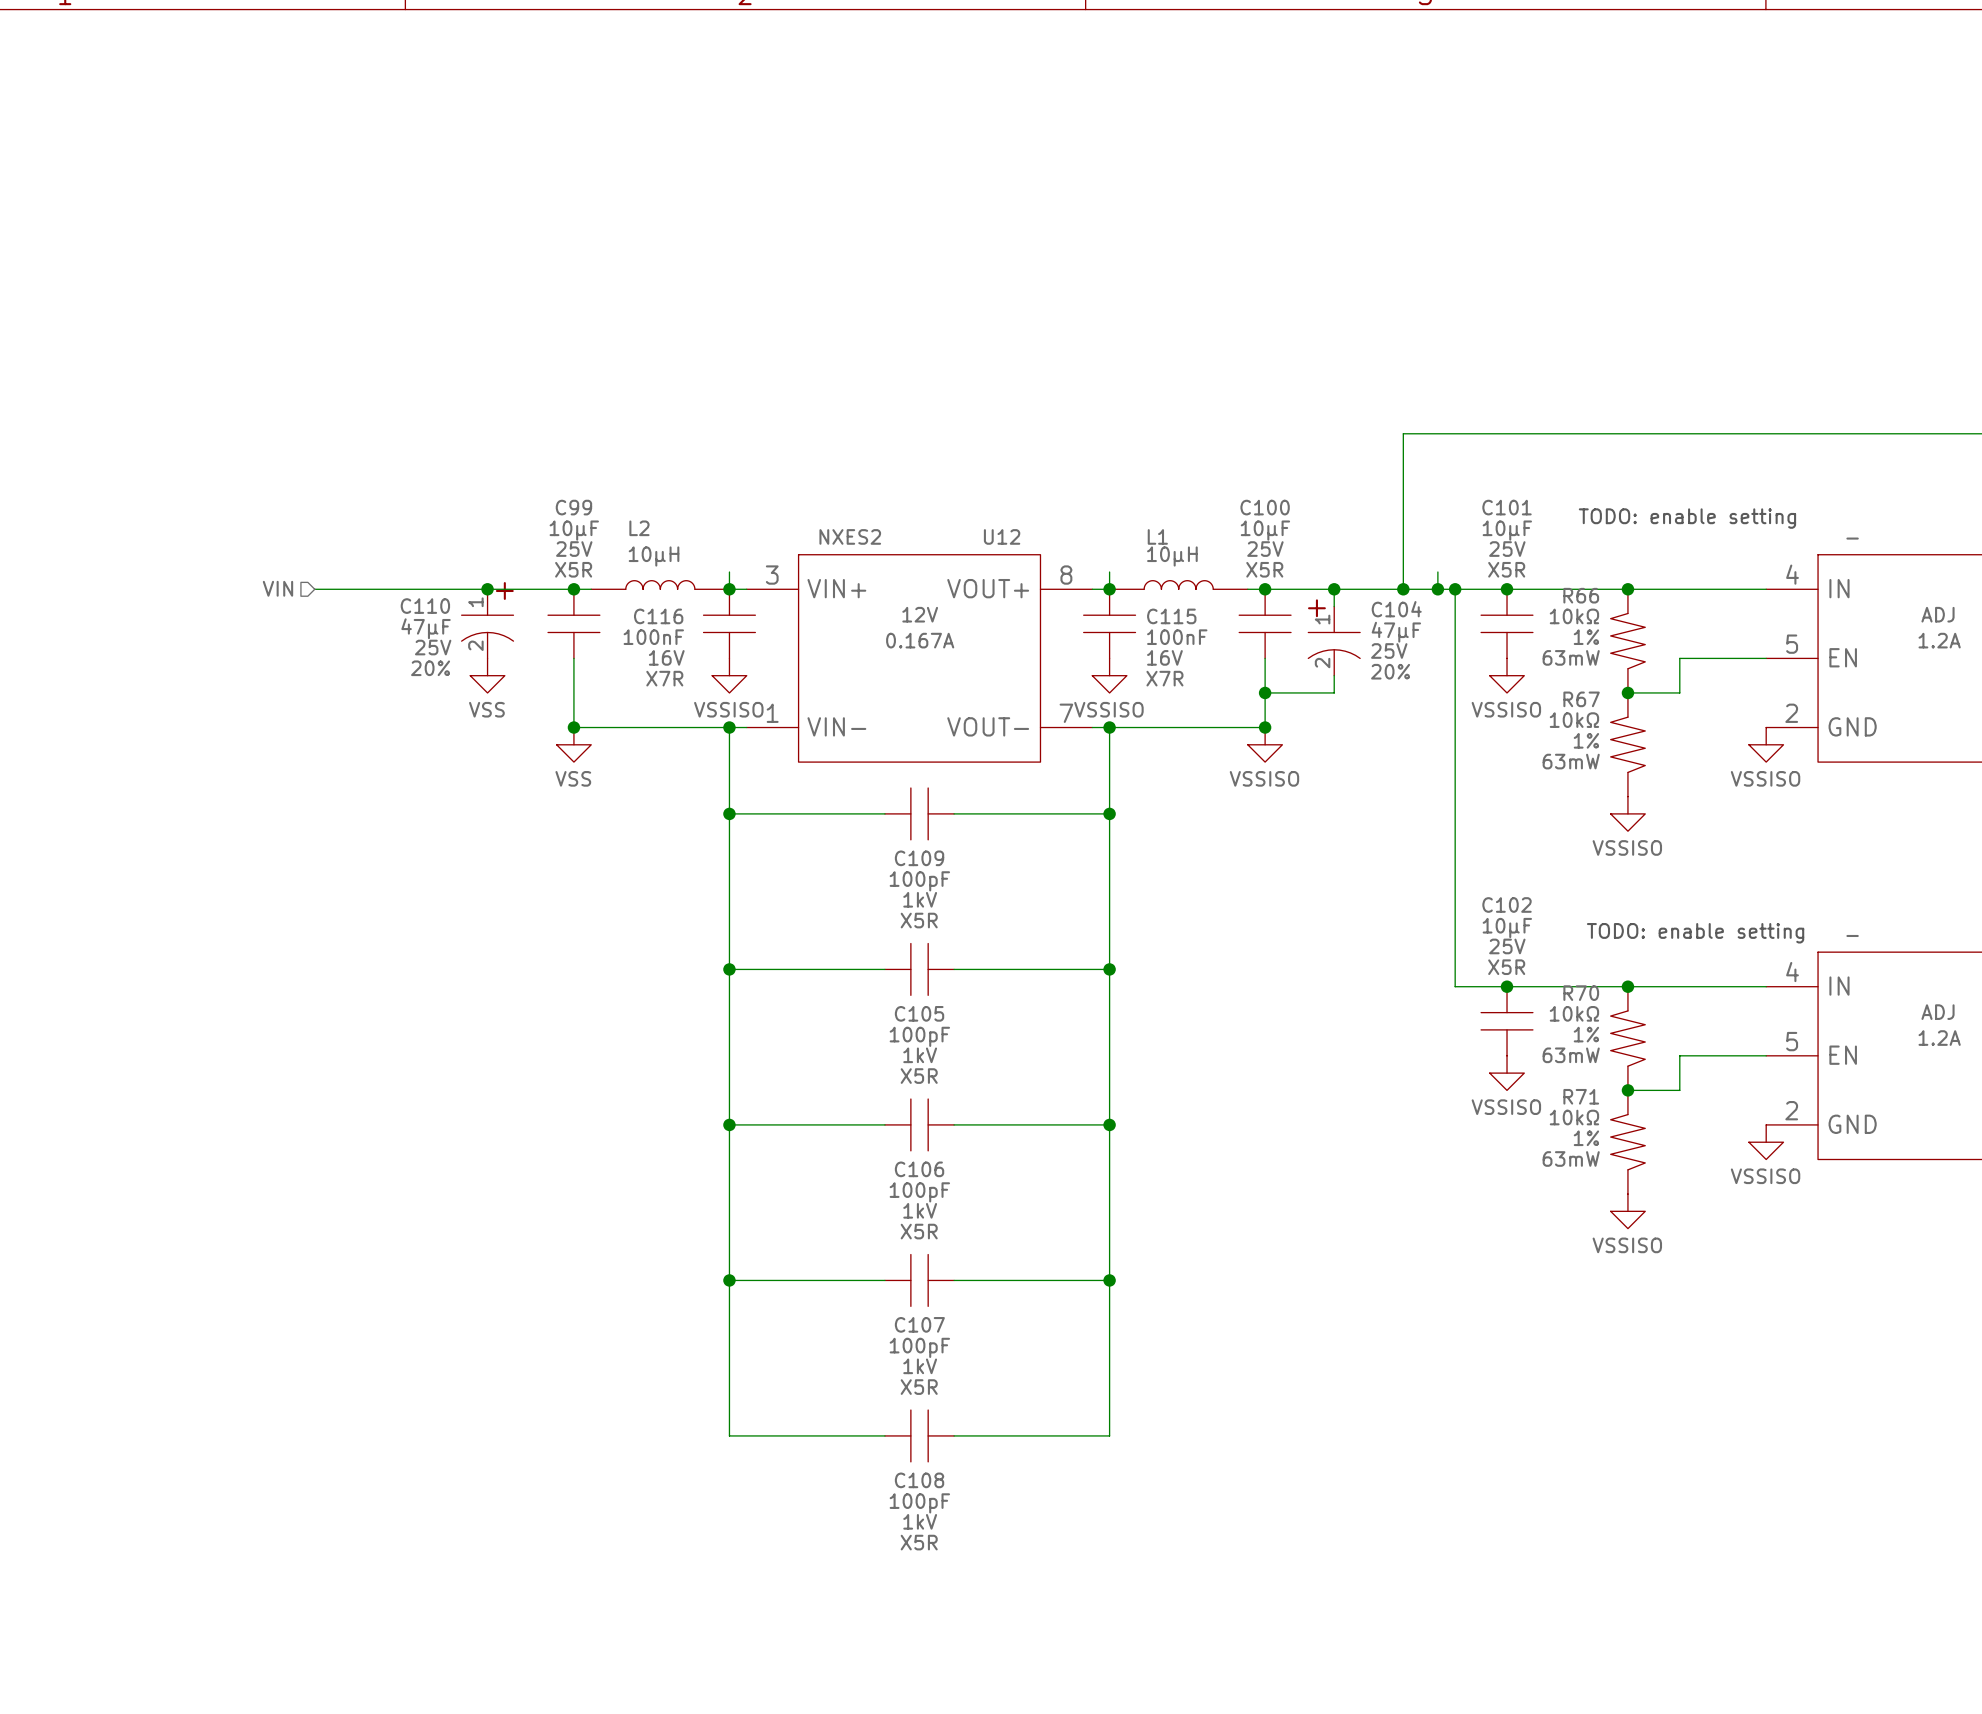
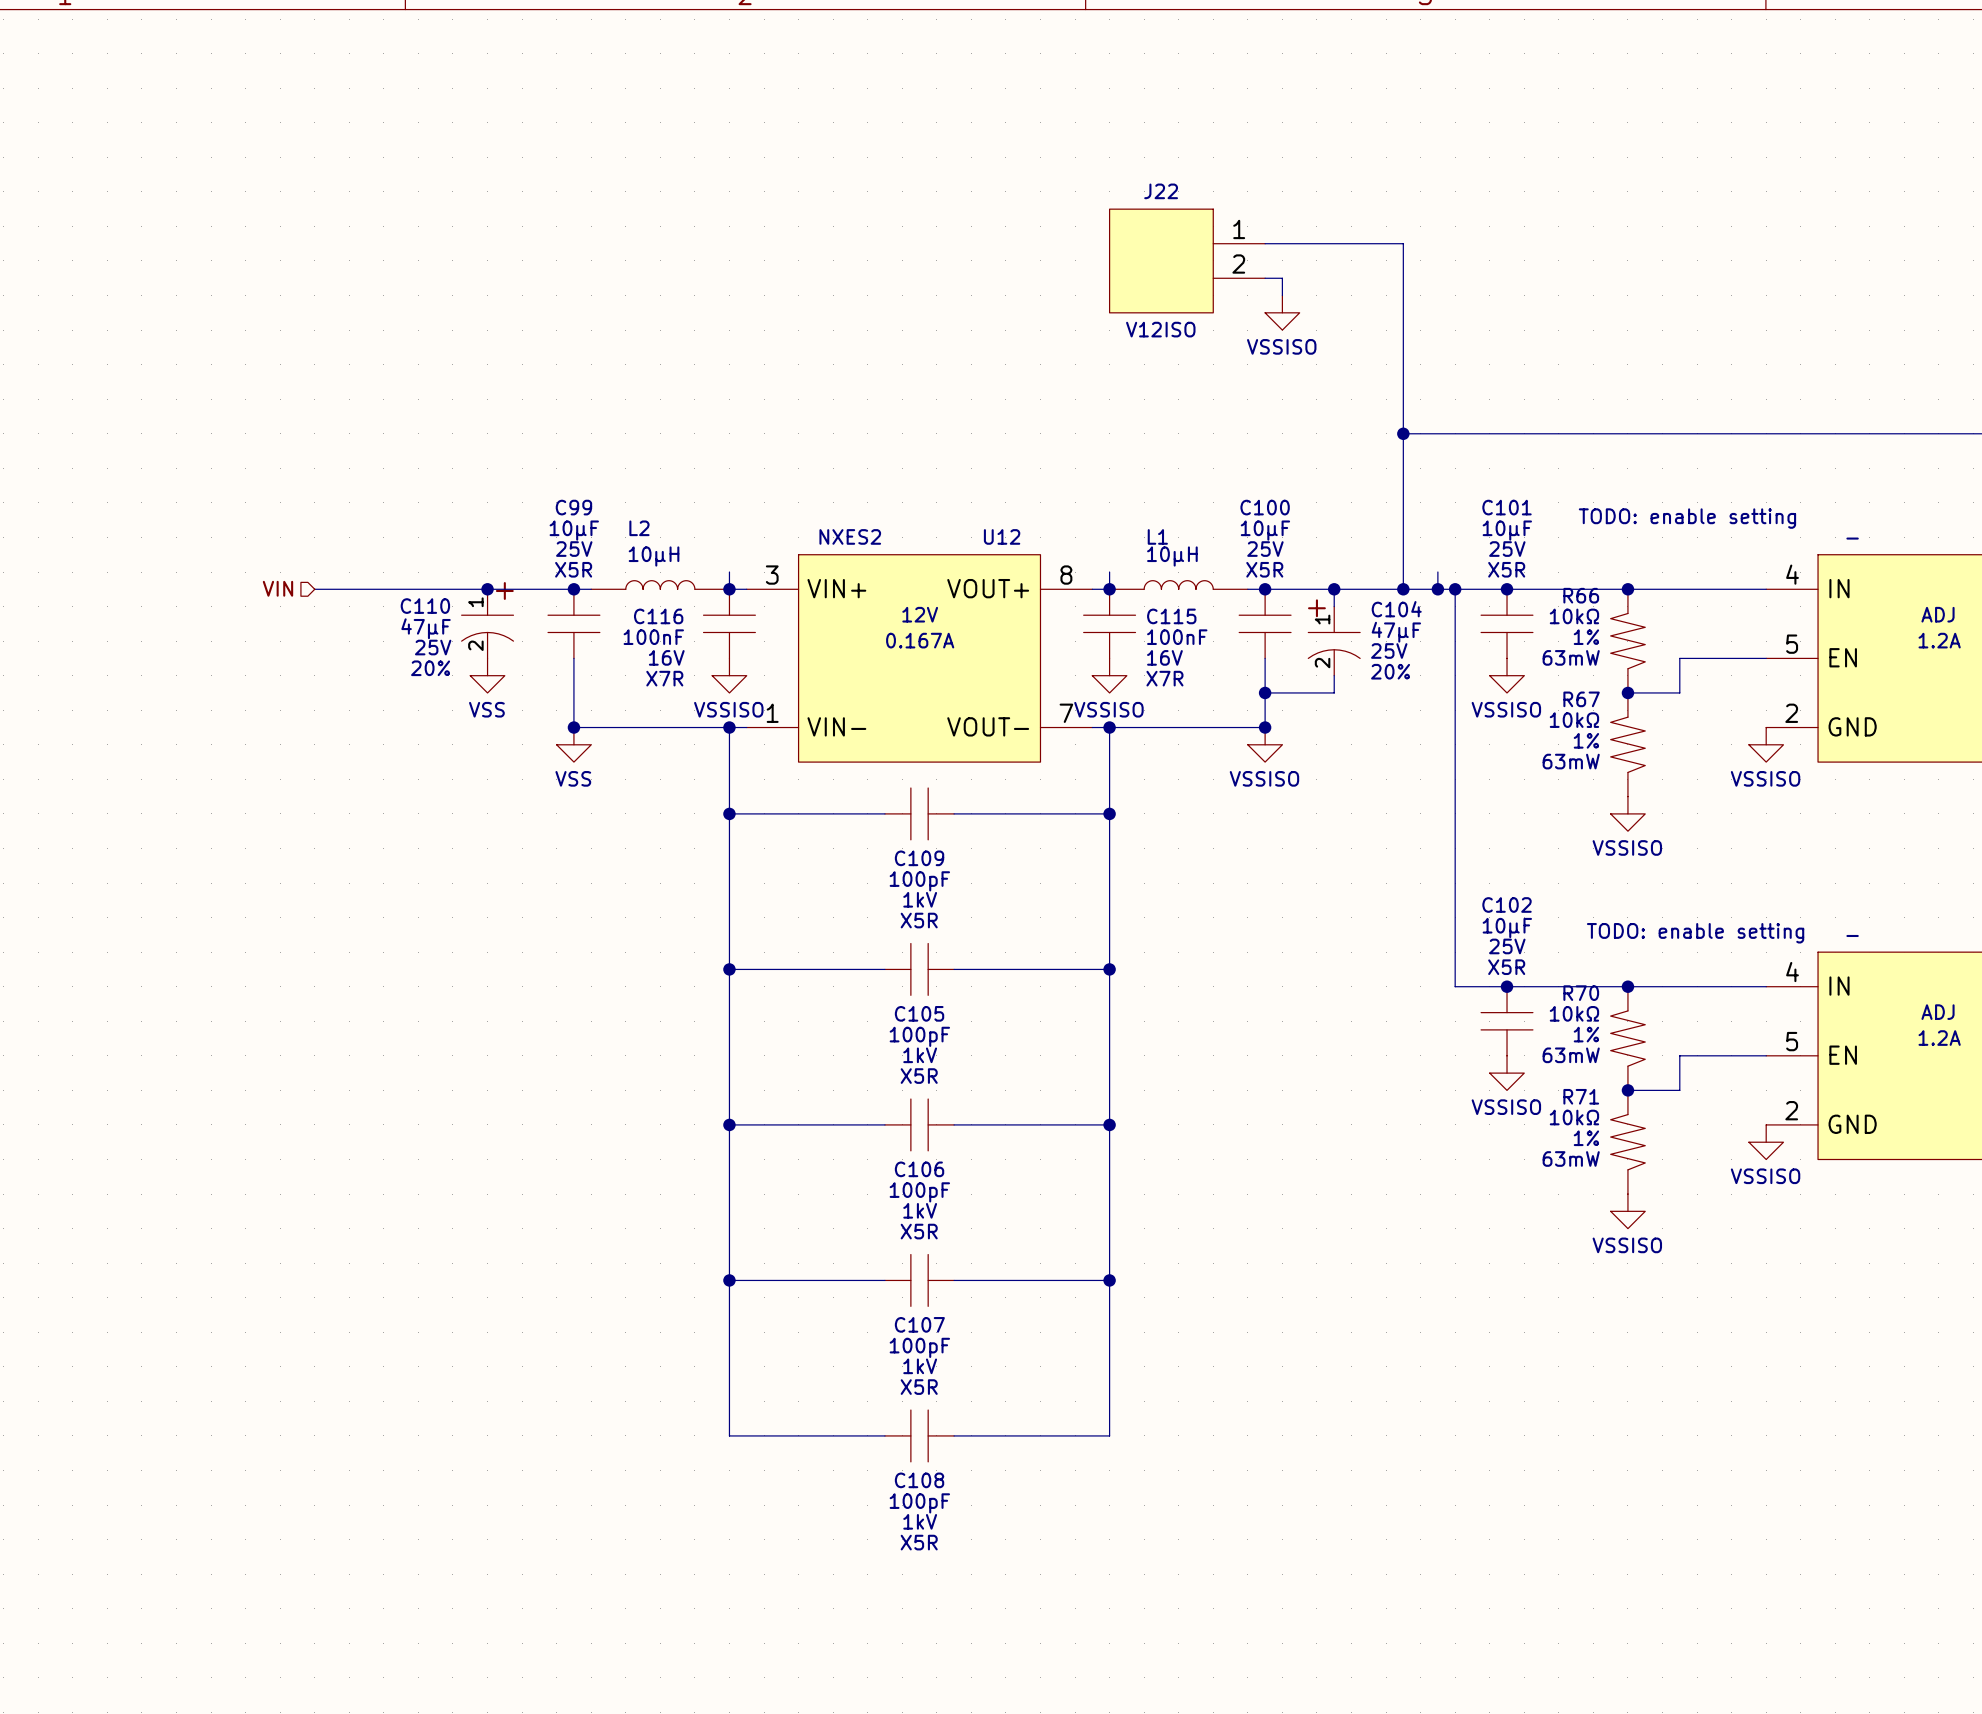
wire: none -> (1265, 243) (1403, 243) (1403, 433)
J22: none -> V12ISO (1187, 260)
wire: none -> (1265, 278) (1282, 278) (1282, 295)
power symbol: none -> VSSISO (1282, 312)
junction: none -> (1403, 433)

